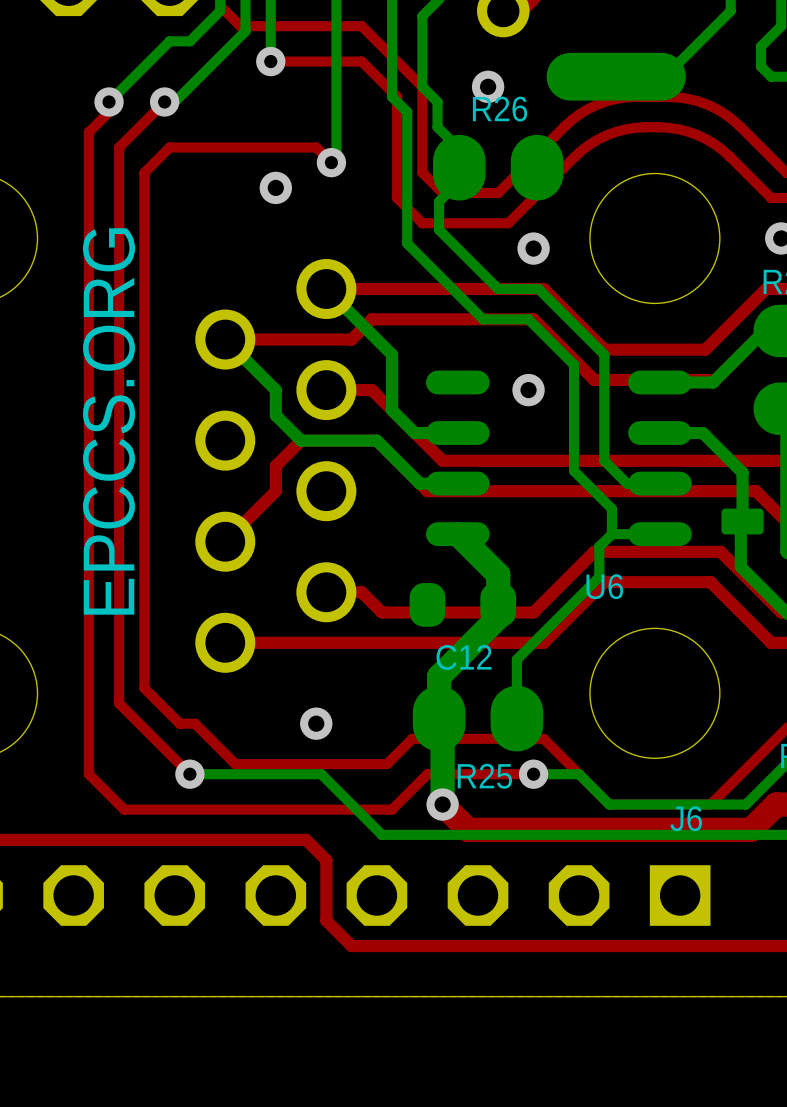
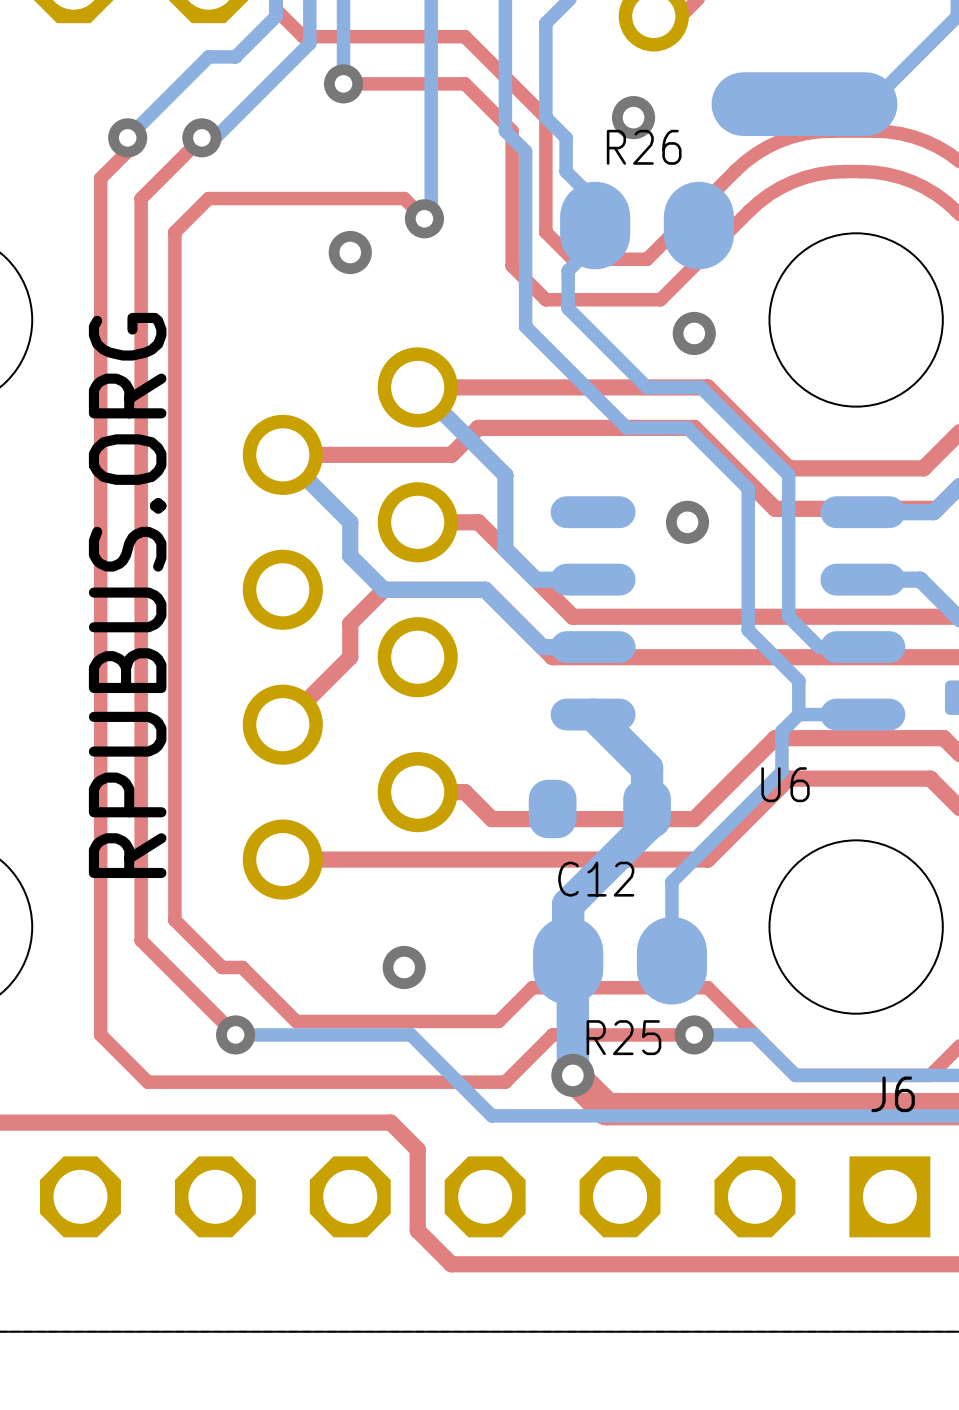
text: EPCCS.ORG (109, 421) -> RPUBUS.ORG (127, 595)

